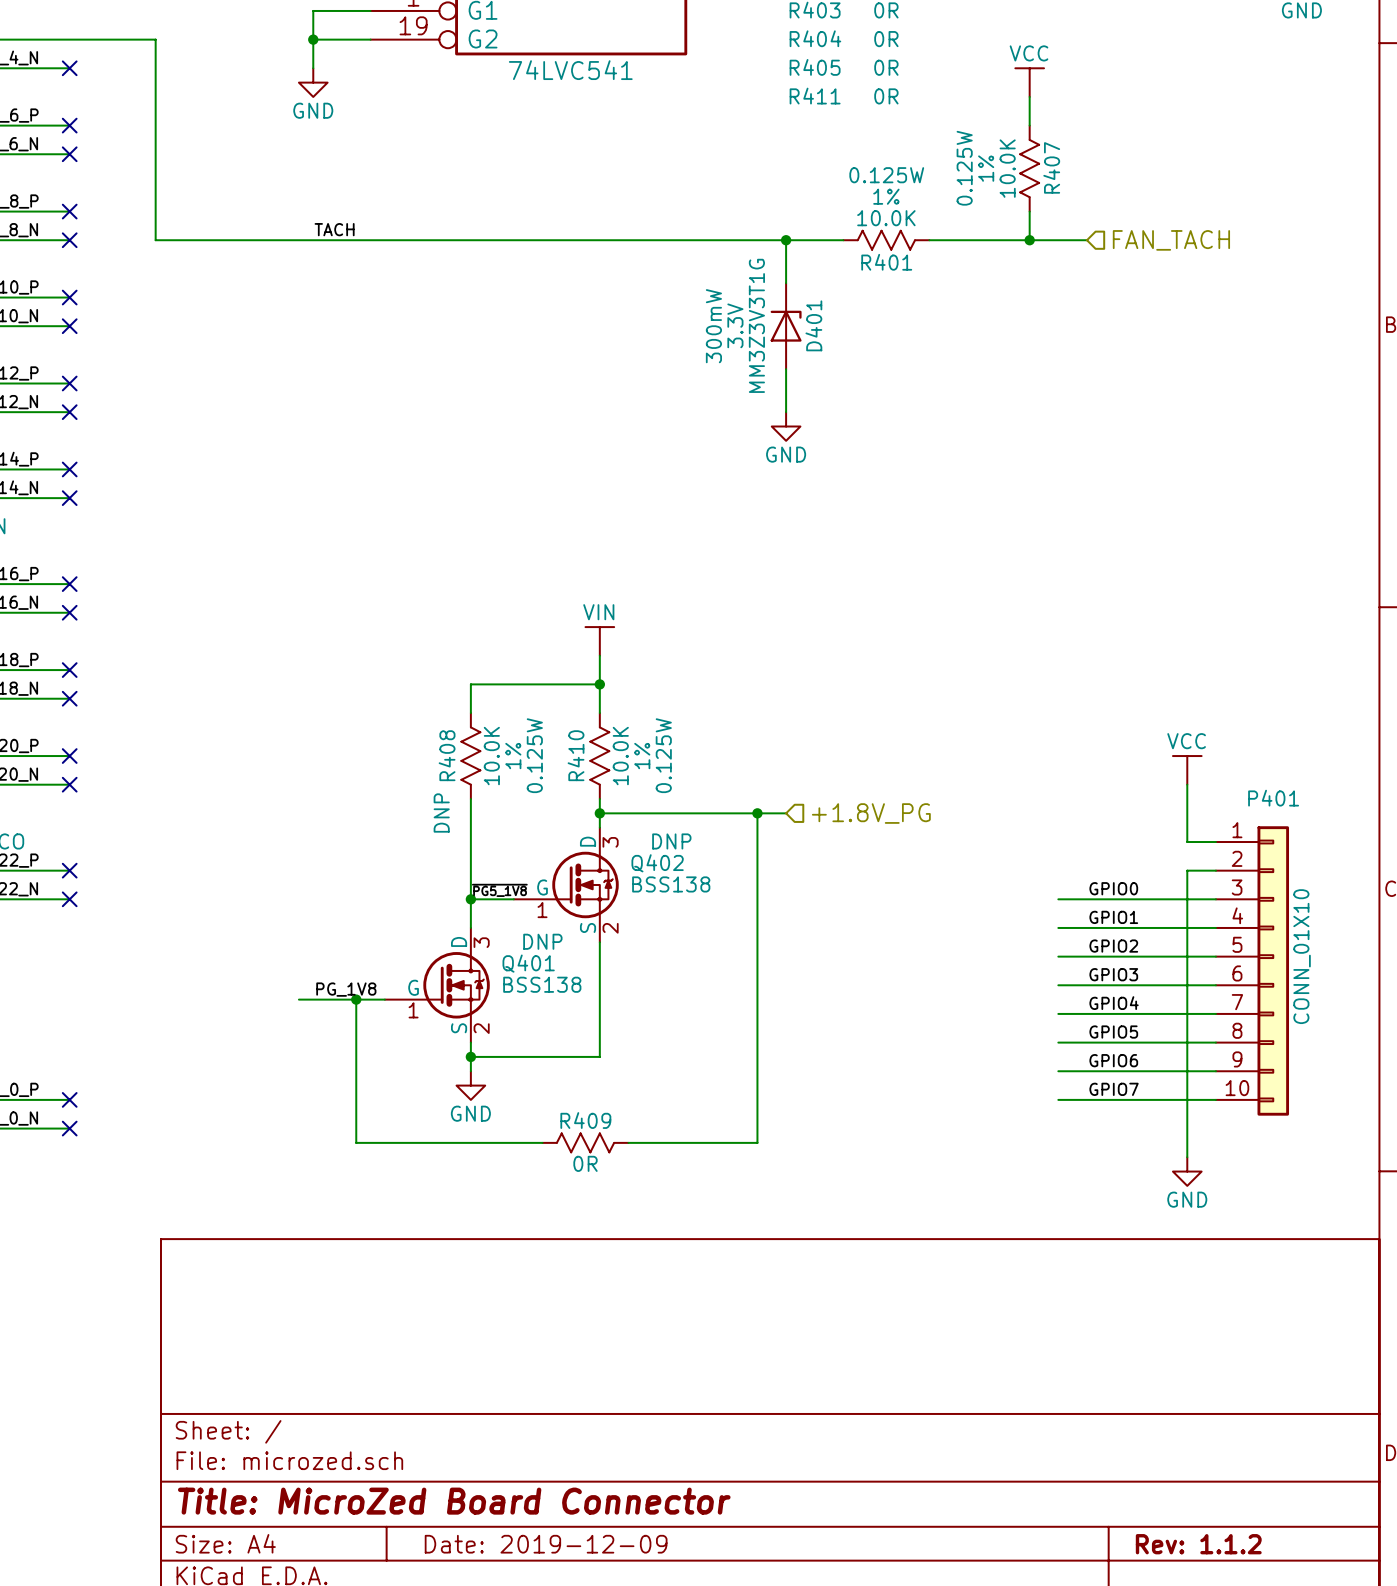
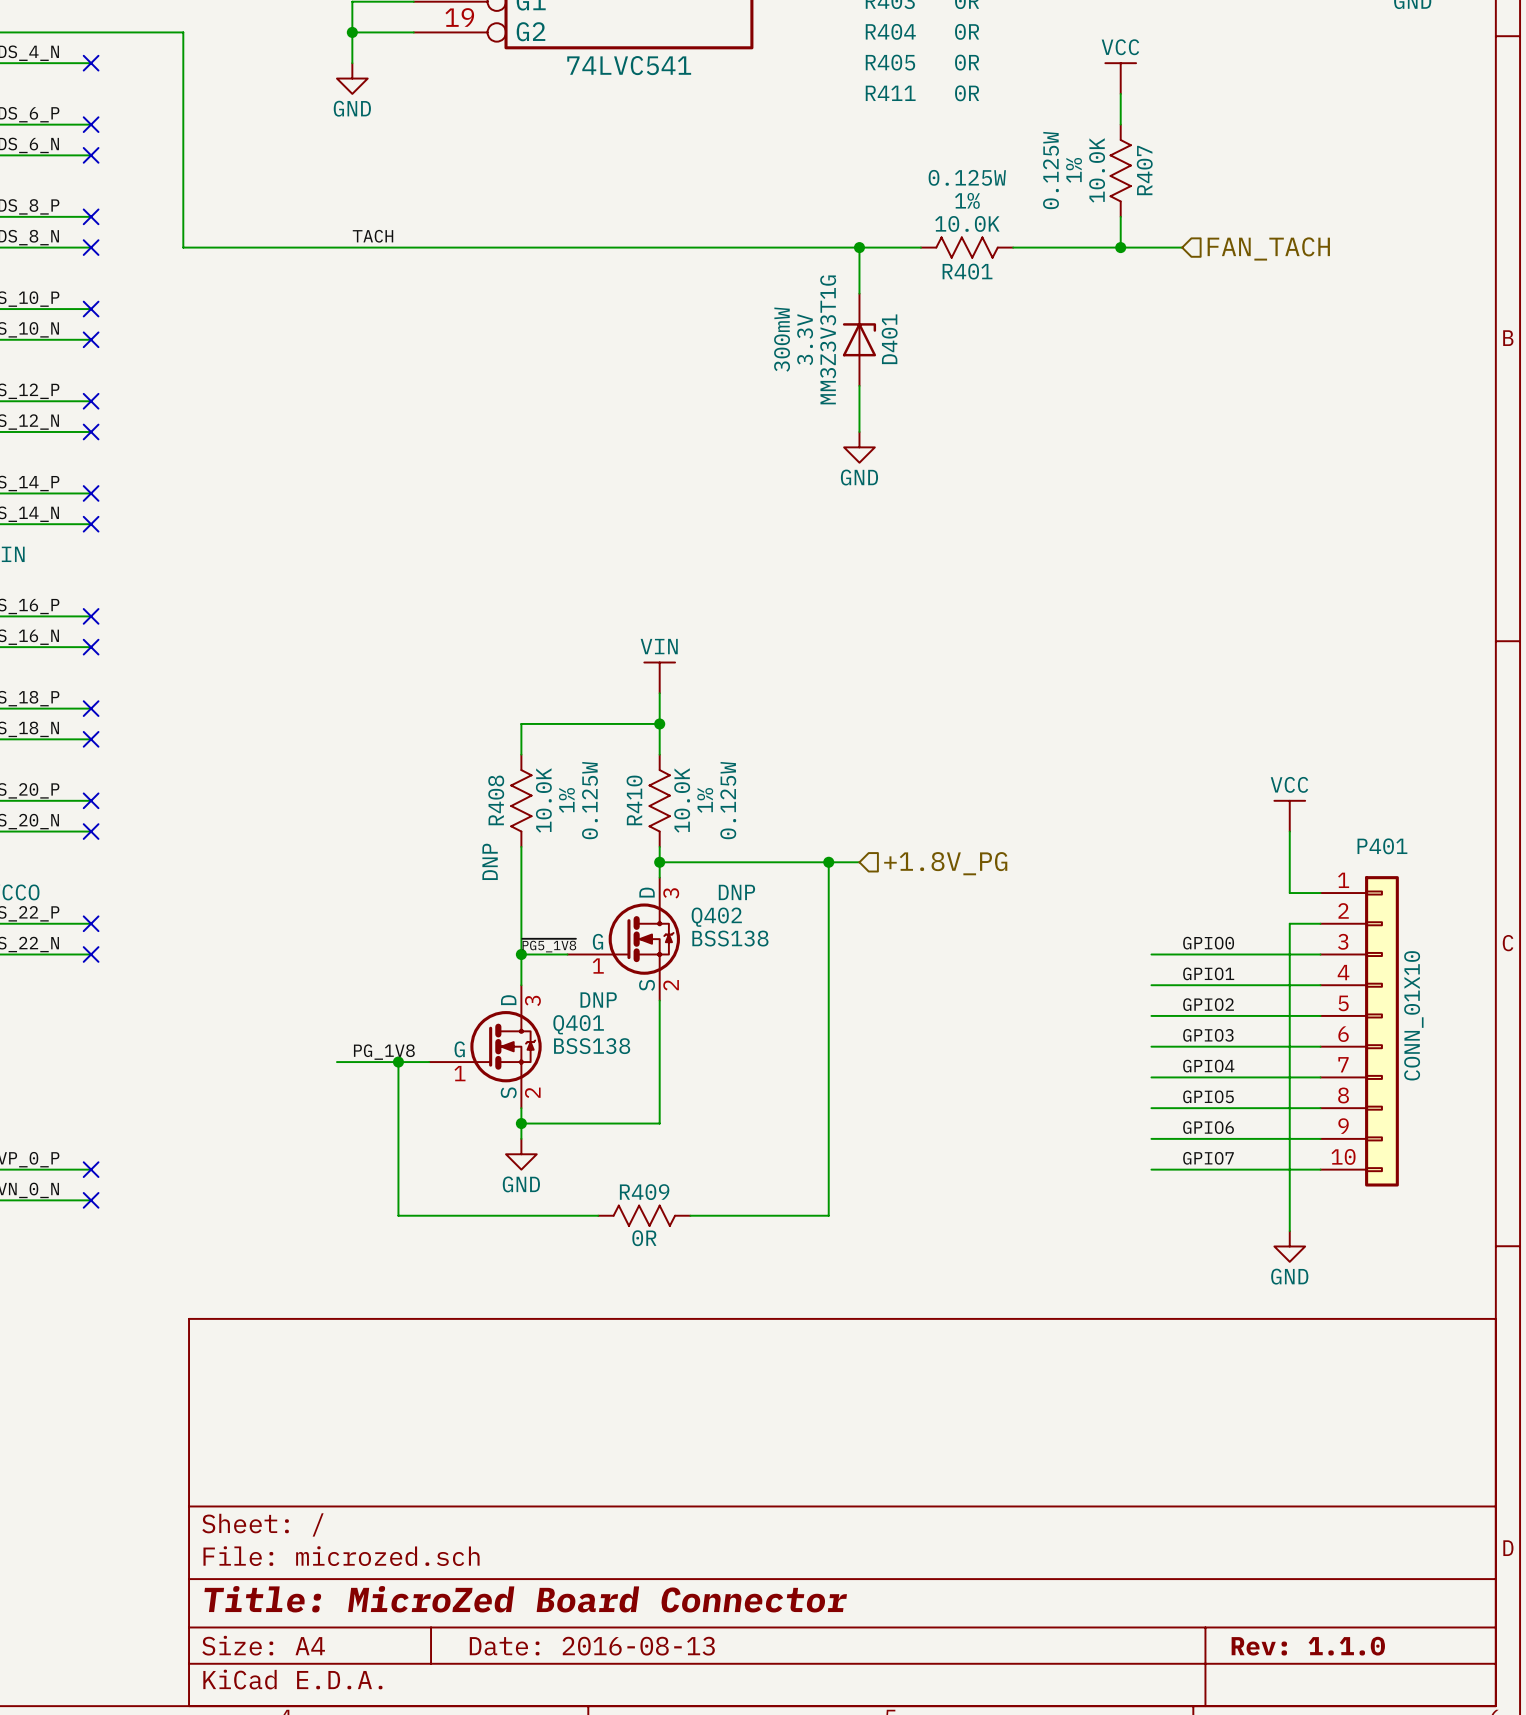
title block: Date: 2019-12-09 (546, 1544) -> Date: 2016-08-13 (592, 1646)
title block: Rev: 1.1.2 (1198, 1544) -> Rev: 1.1.0 (1308, 1646)

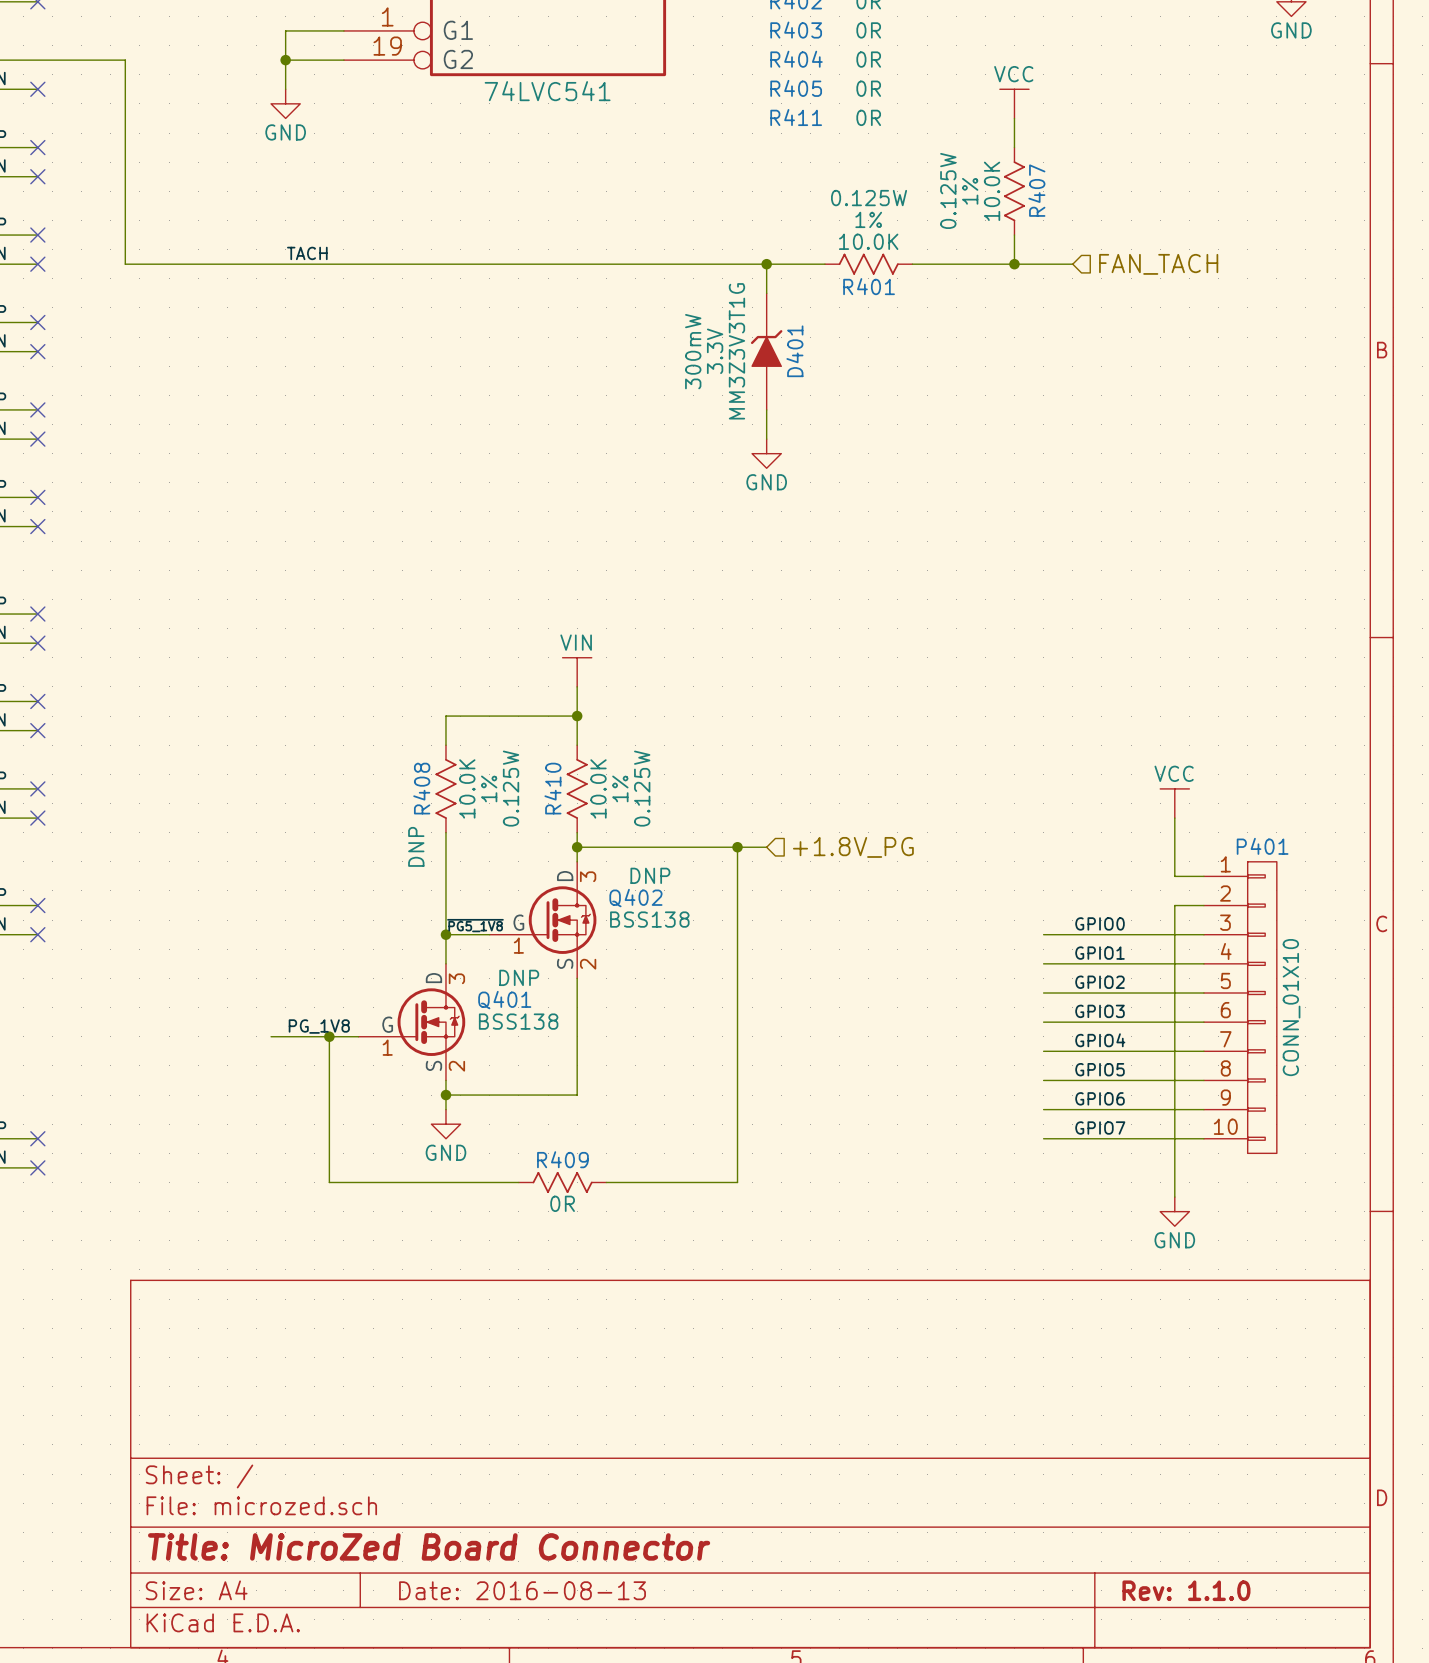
D401 symbol: [842, 293, 877, 386] -> [750, 293, 783, 410]
P401 symbol: [1320, 876, 1399, 1187] -> [1203, 861, 1277, 1154]

